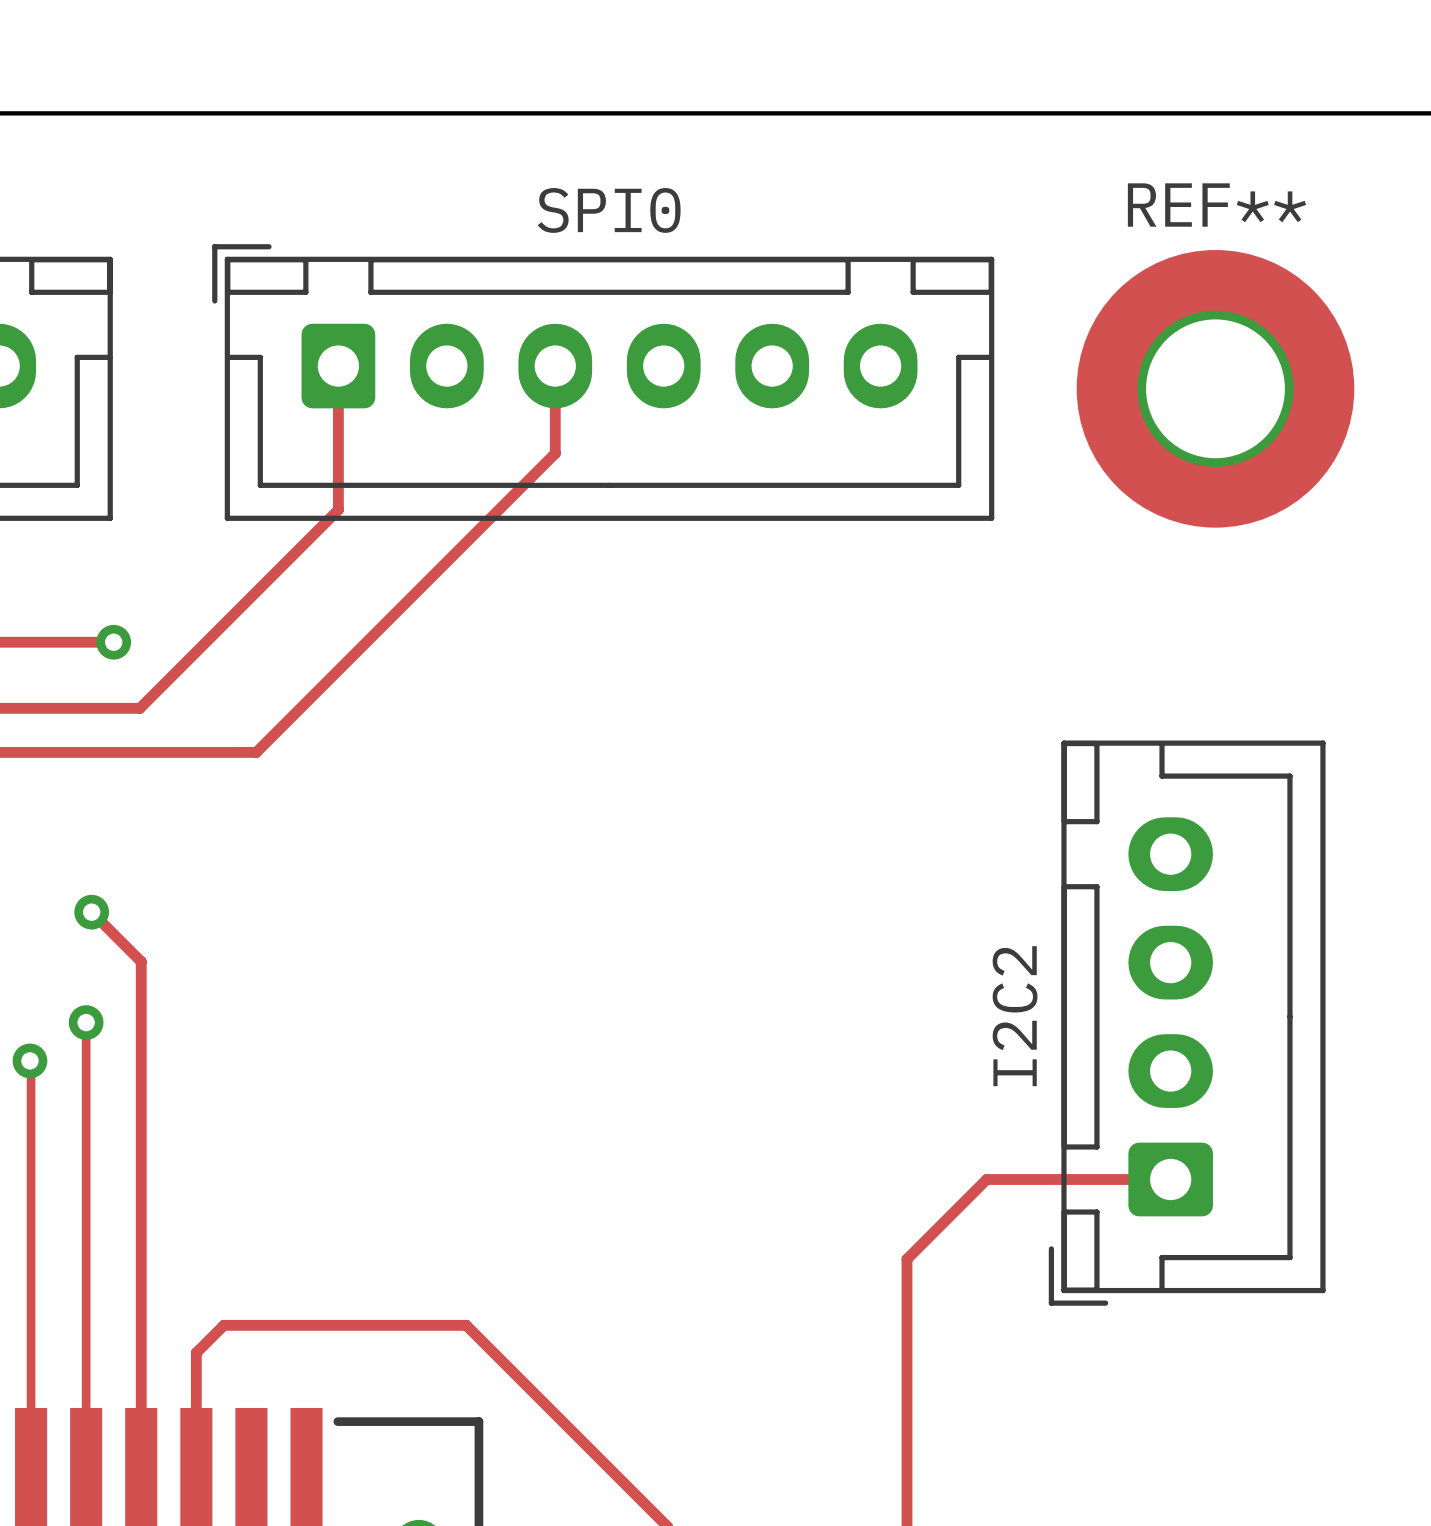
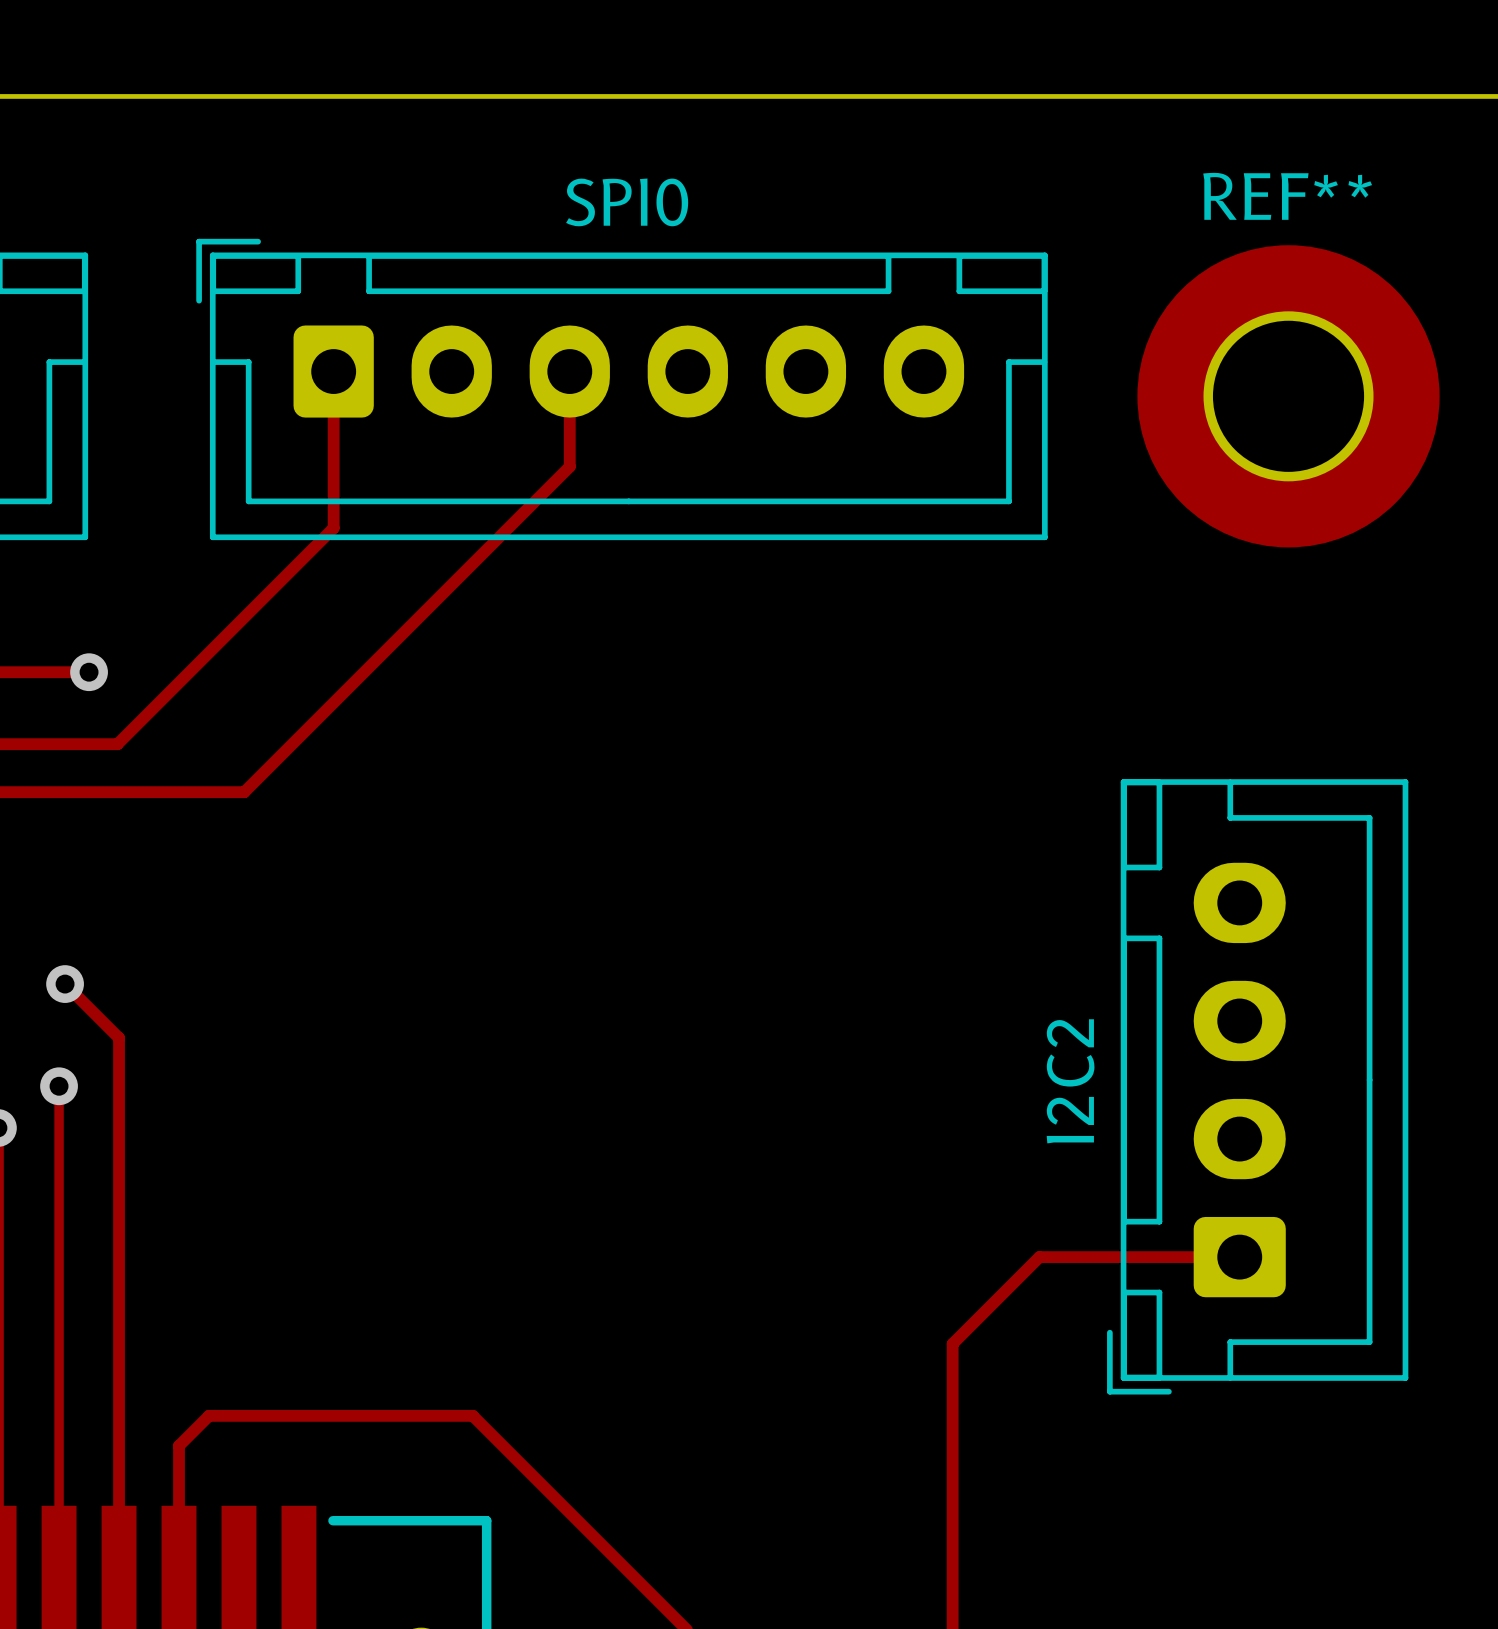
track: (91, 912) (141, 961) (141, 978) -> (65, 984) (119, 1038)
via position: (91, 912) -> (65, 984)

